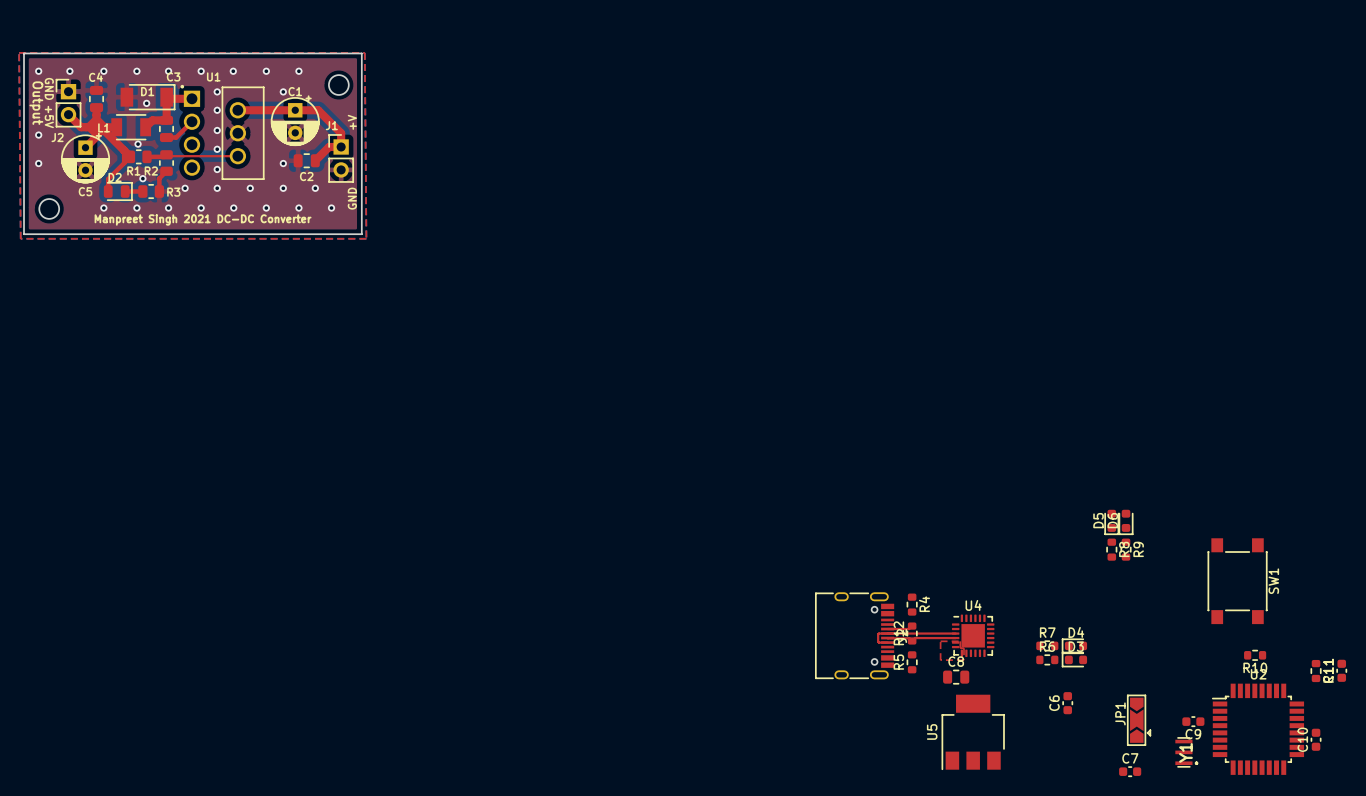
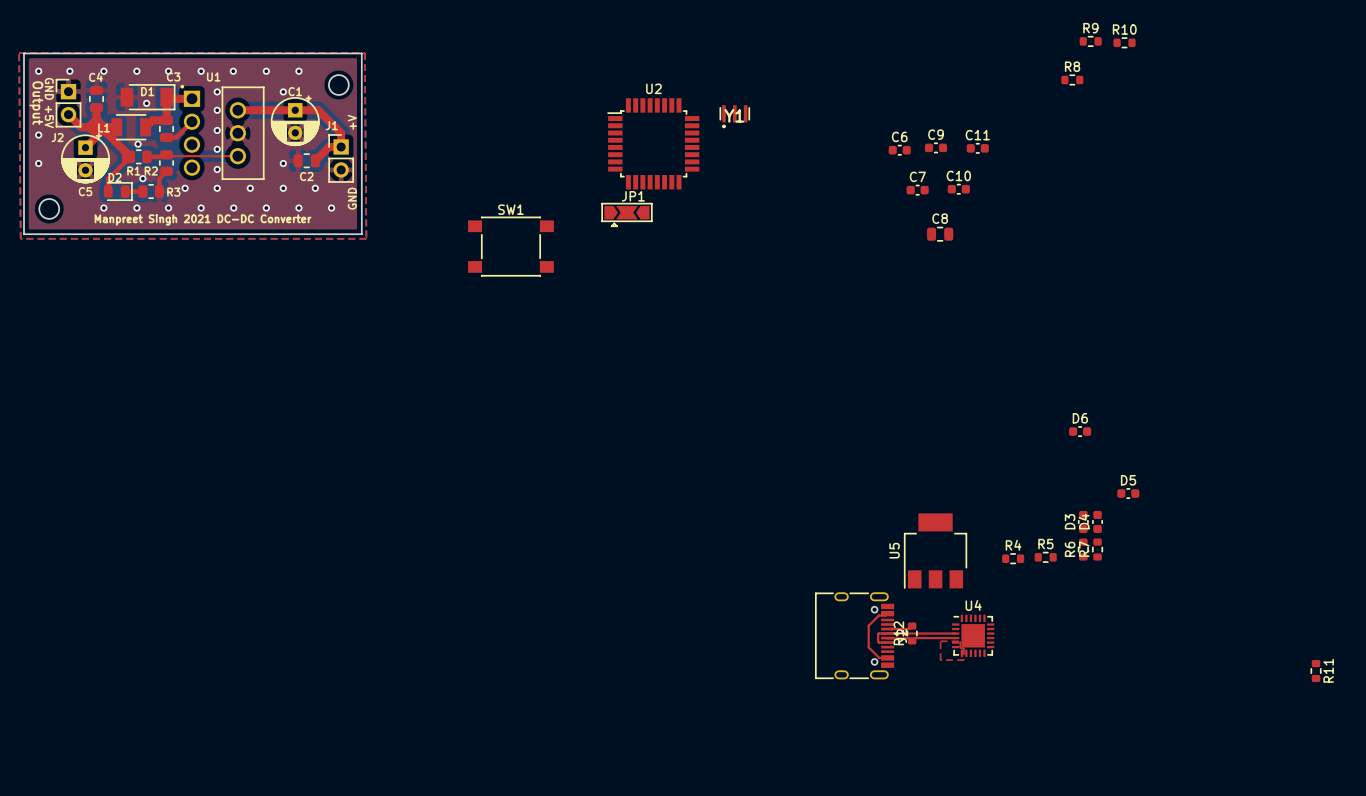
D5 footprint: [1104, 509, 1119, 535] -> [1117, 488, 1140, 499]
D6 footprint: [1118, 509, 1134, 535] -> [1069, 426, 1092, 437]
R8 rotation: 0° (1111, 549) -> 90° clockwise (1072, 79)
R8 position: (1111, 549) -> (1072, 79)
R8 name position: R8 (1124, 549) -> R8 (1072, 66)
R9 rotation: 0° (1126, 549) -> 90° clockwise (1090, 41)
R9 position: (1126, 549) -> (1090, 41)
R9 name position: R9 (1138, 549) -> R9 (1090, 28)
SW1 rotation: 0° (1237, 581) -> 90° clockwise (510, 246)
SW1 position: (1237, 581) -> (510, 246)
SW1 name position: SW1 (1273, 581) -> SW1 (510, 209)
R4 rotation: 0° (912, 604) -> 90° clockwise (1013, 558)
R4 position: (912, 604) -> (1013, 558)
R4 name position: R4 (924, 604) -> R4 (1013, 545)
top track: none -> (887, 613) (878, 615) (868, 625) (868, 647) (879, 657) (887, 657)
R7 name position: R7 (1047, 632) -> R7 (1084, 549)
D4 name position: D4 (1076, 632) -> D4 (1084, 521)
D4 footprint: [1062, 638, 1088, 654] -> [1092, 510, 1103, 534]
R7 rotation: 0° (1047, 645) -> 90° clockwise (1097, 549)
R7 position: (1047, 645) -> (1097, 549)
R6 name position: R6 (1047, 646) -> R6 (1070, 549)
D3 name position: D3 (1076, 646) -> D3 (1070, 521)
D3 footprint: [1062, 652, 1088, 668] -> [1078, 510, 1089, 534]
R10 position: (1255, 655) -> (1124, 42)
R6 rotation: 0° (1047, 659) -> 90° clockwise (1083, 549)
R6 position: (1047, 659) -> (1083, 549)
R5 rotation: 0° (912, 662) -> 90° clockwise (1045, 557)
R5 position: (912, 662) -> (1045, 557)
R10 name position: R10 (1255, 667) -> R10 (1124, 29)
C11 rotation: 0° (1341, 670) -> 90° clockwise (977, 148)
C11 position: (1341, 670) -> (977, 148)
C8 position: (956, 677) -> (940, 234)
C6 rotation: 0° (1067, 703) -> 90° clockwise (899, 150)
C6 position: (1067, 703) -> (899, 150)
JP1 rotation: 0° (1139, 720) -> 90° clockwise (626, 214)
JP1 position: (1139, 720) -> (626, 214)
C9 position: (1193, 721) -> (936, 147)
U2 position: (1258, 729) -> (653, 143)
U5 position: (973, 732) -> (935, 550)
C9 name position: C9 (1193, 734) -> C9 (936, 134)
C10 rotation: 0° (1316, 739) -> 90° clockwise (958, 189)
C10 position: (1316, 739) -> (958, 189)
Y1 rotation: 0° (1186, 752) -> 90° clockwise (734, 116)
Y1 position: (1186, 752) -> (734, 116)
C7 position: (1130, 771) -> (917, 190)

